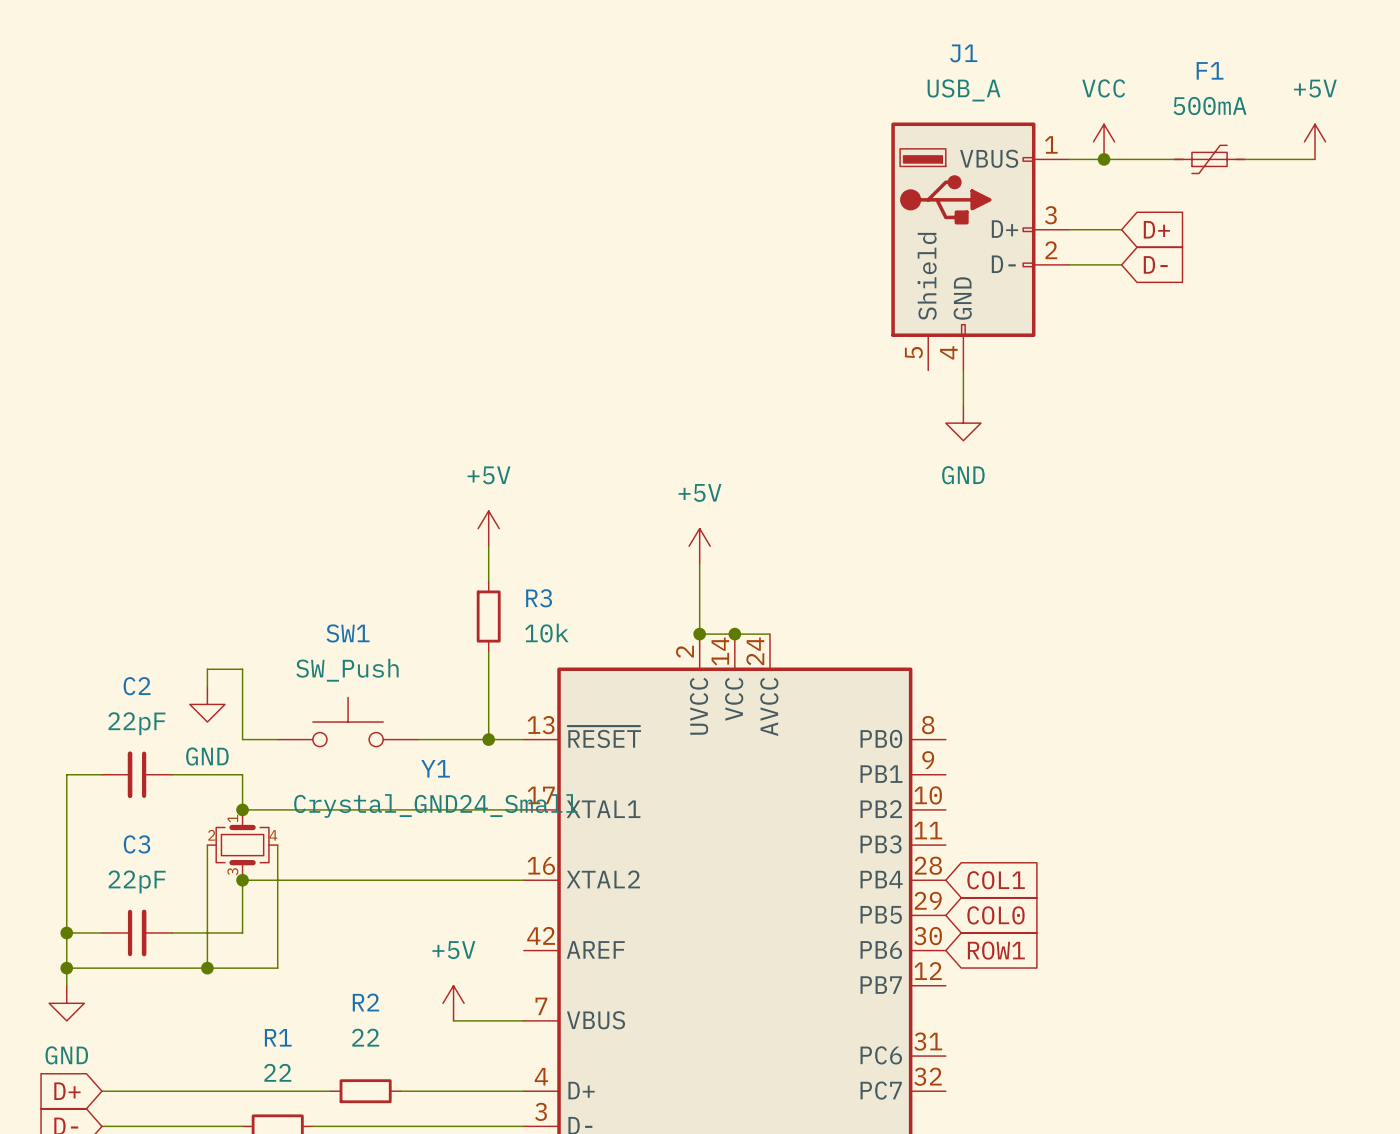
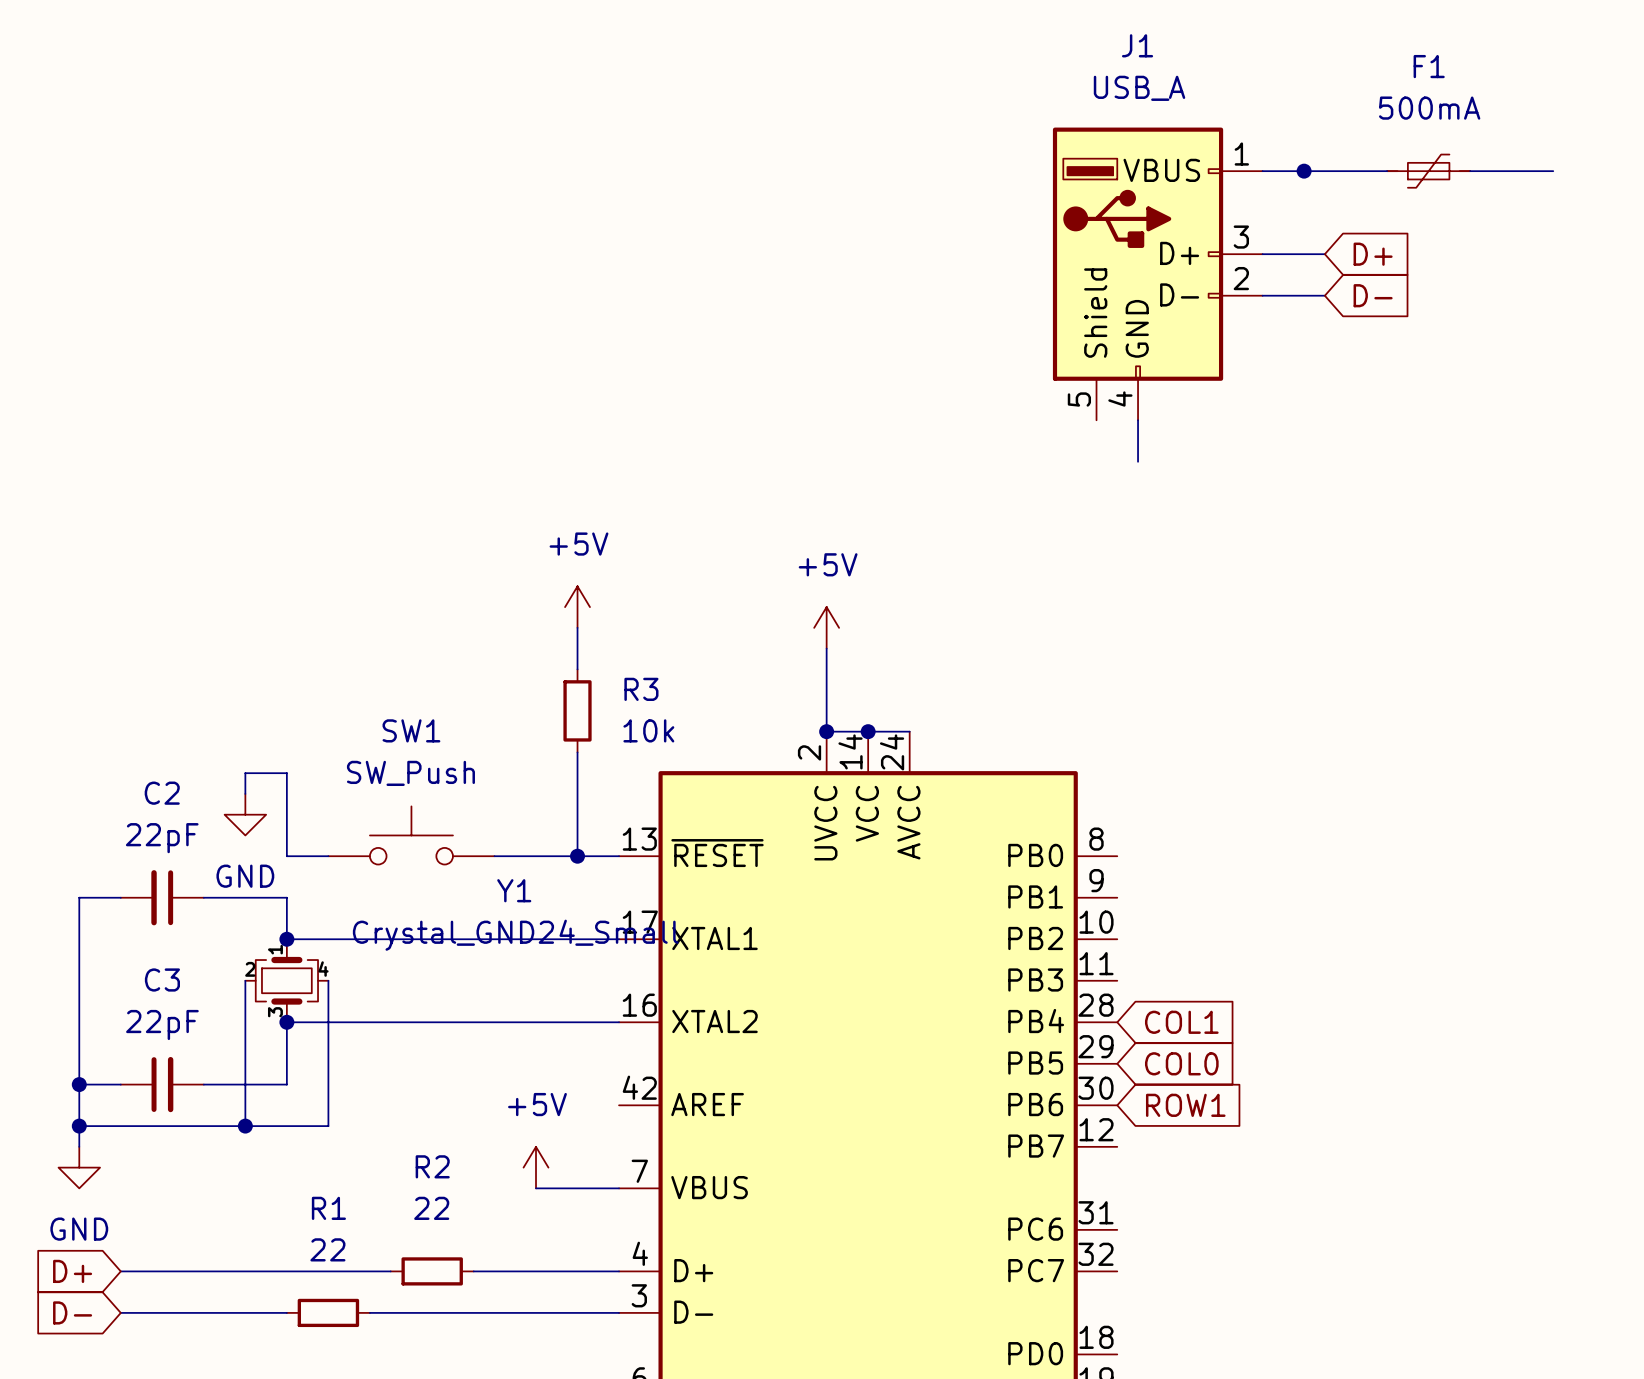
power symbol: VCC (1104, 141) -> none
power symbol: +5V (1315, 141) -> none
power symbol: GND (963, 423) -> none

